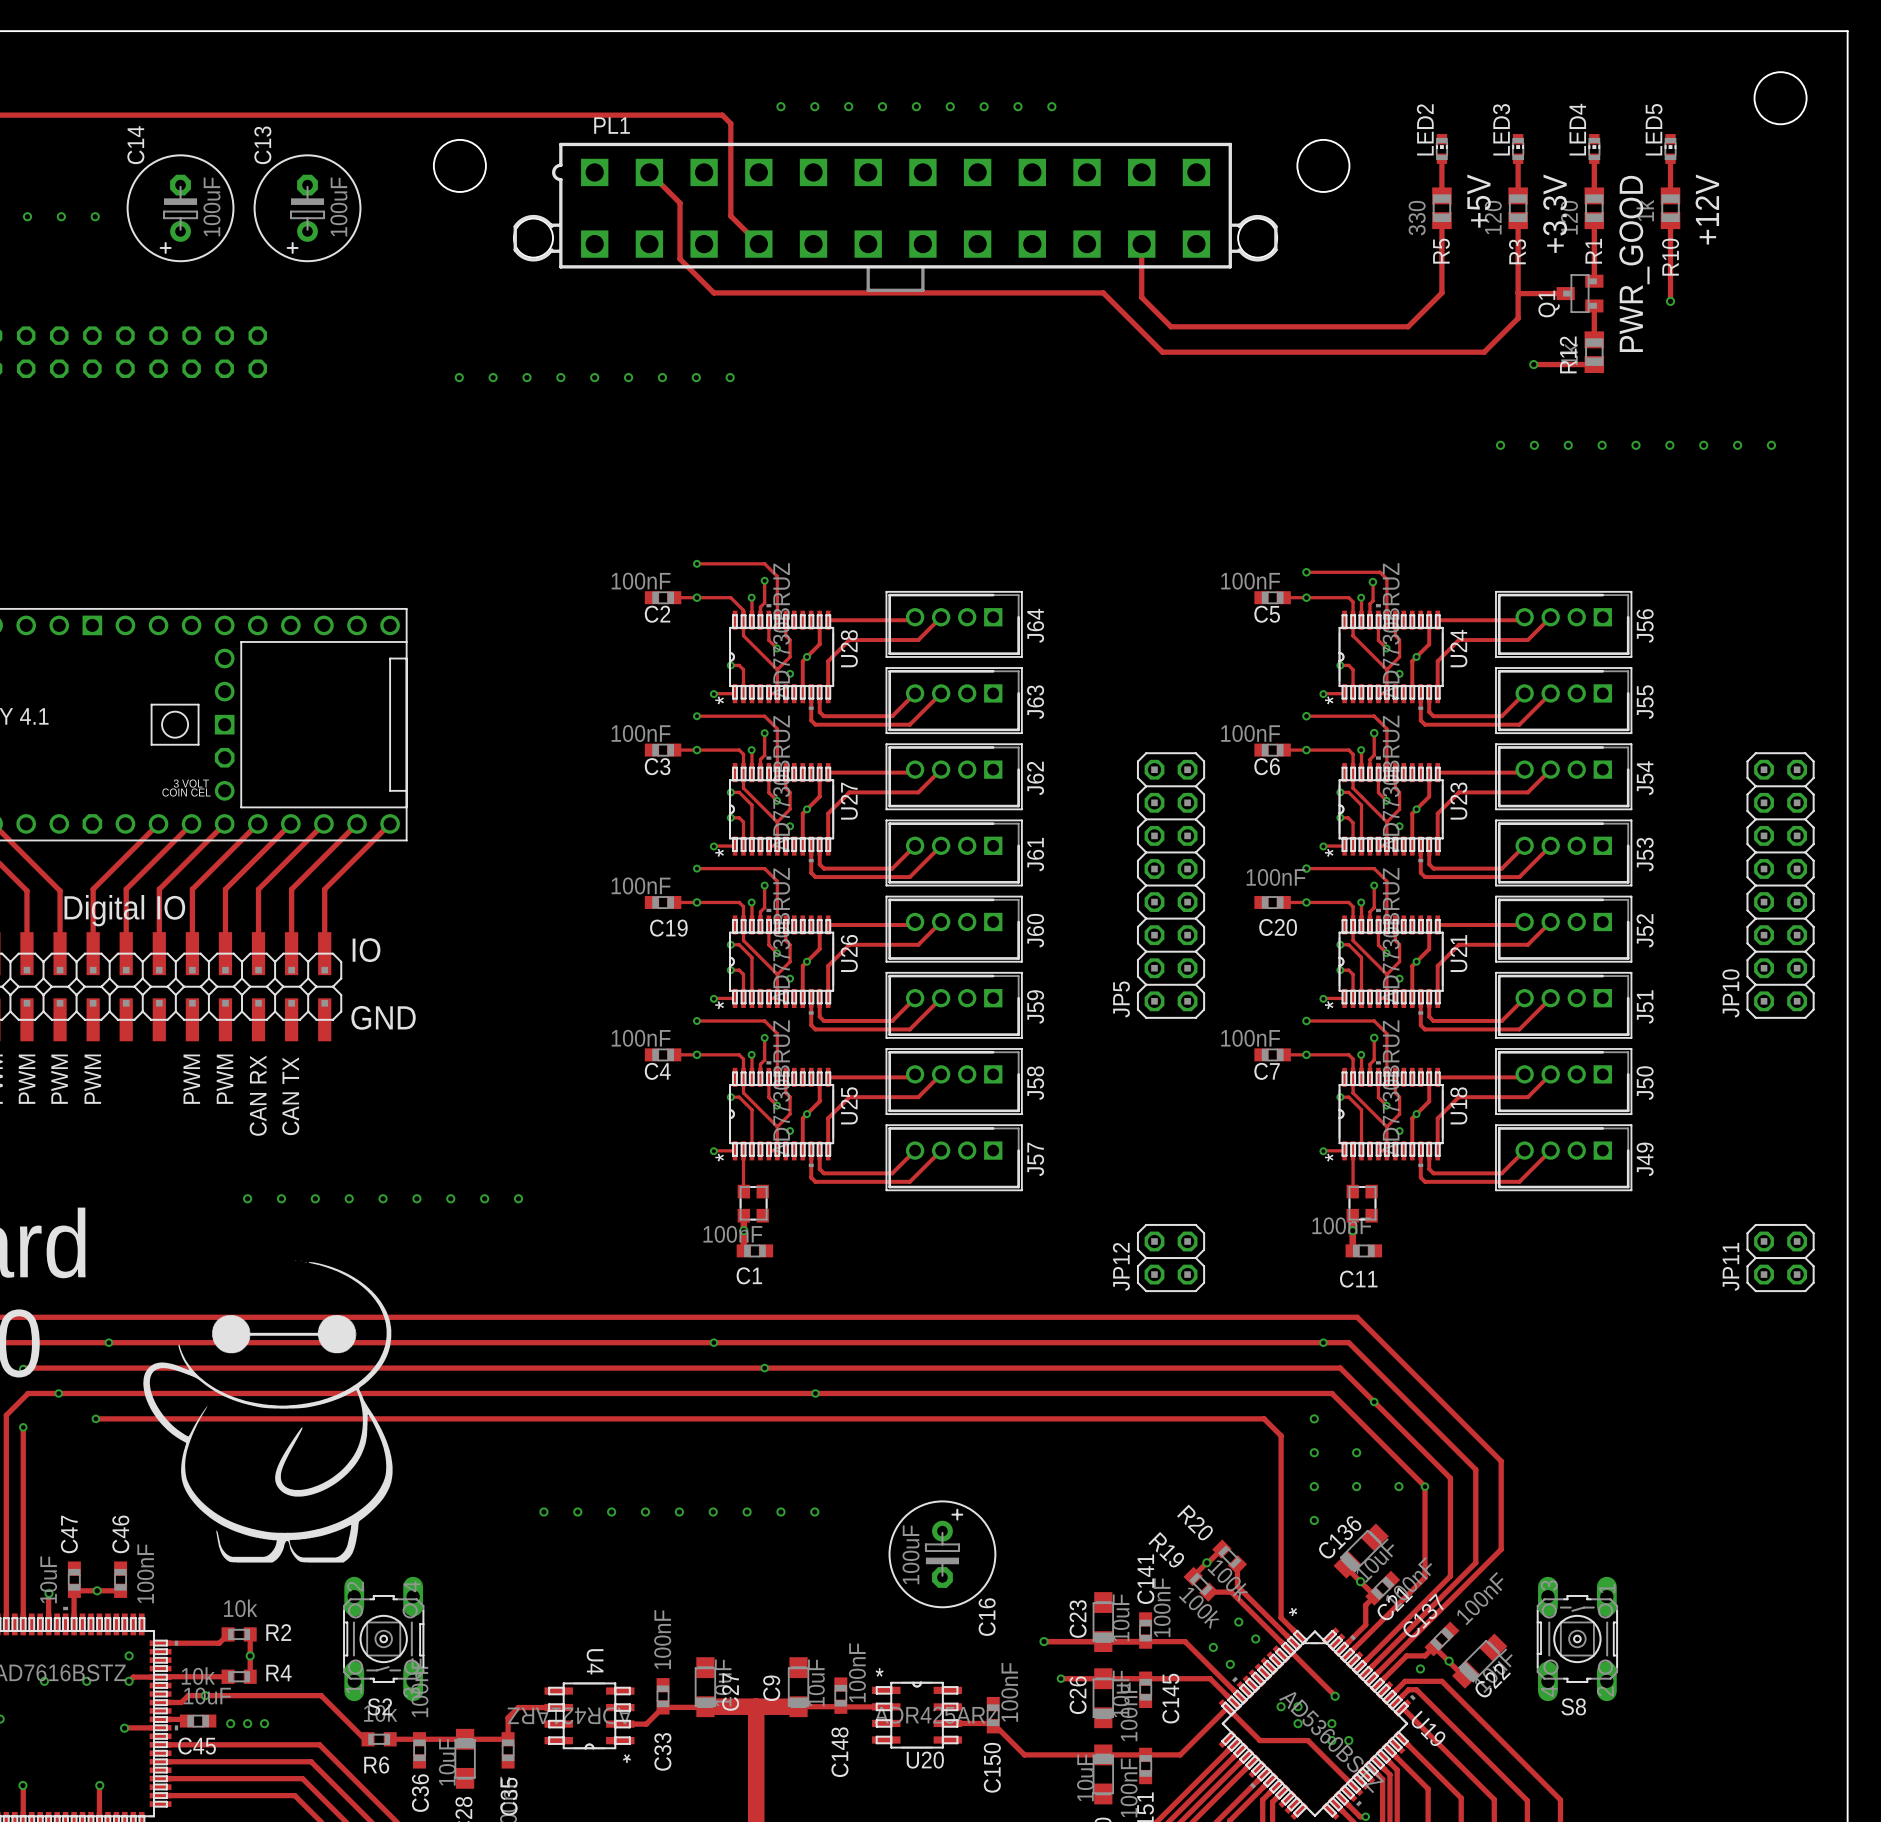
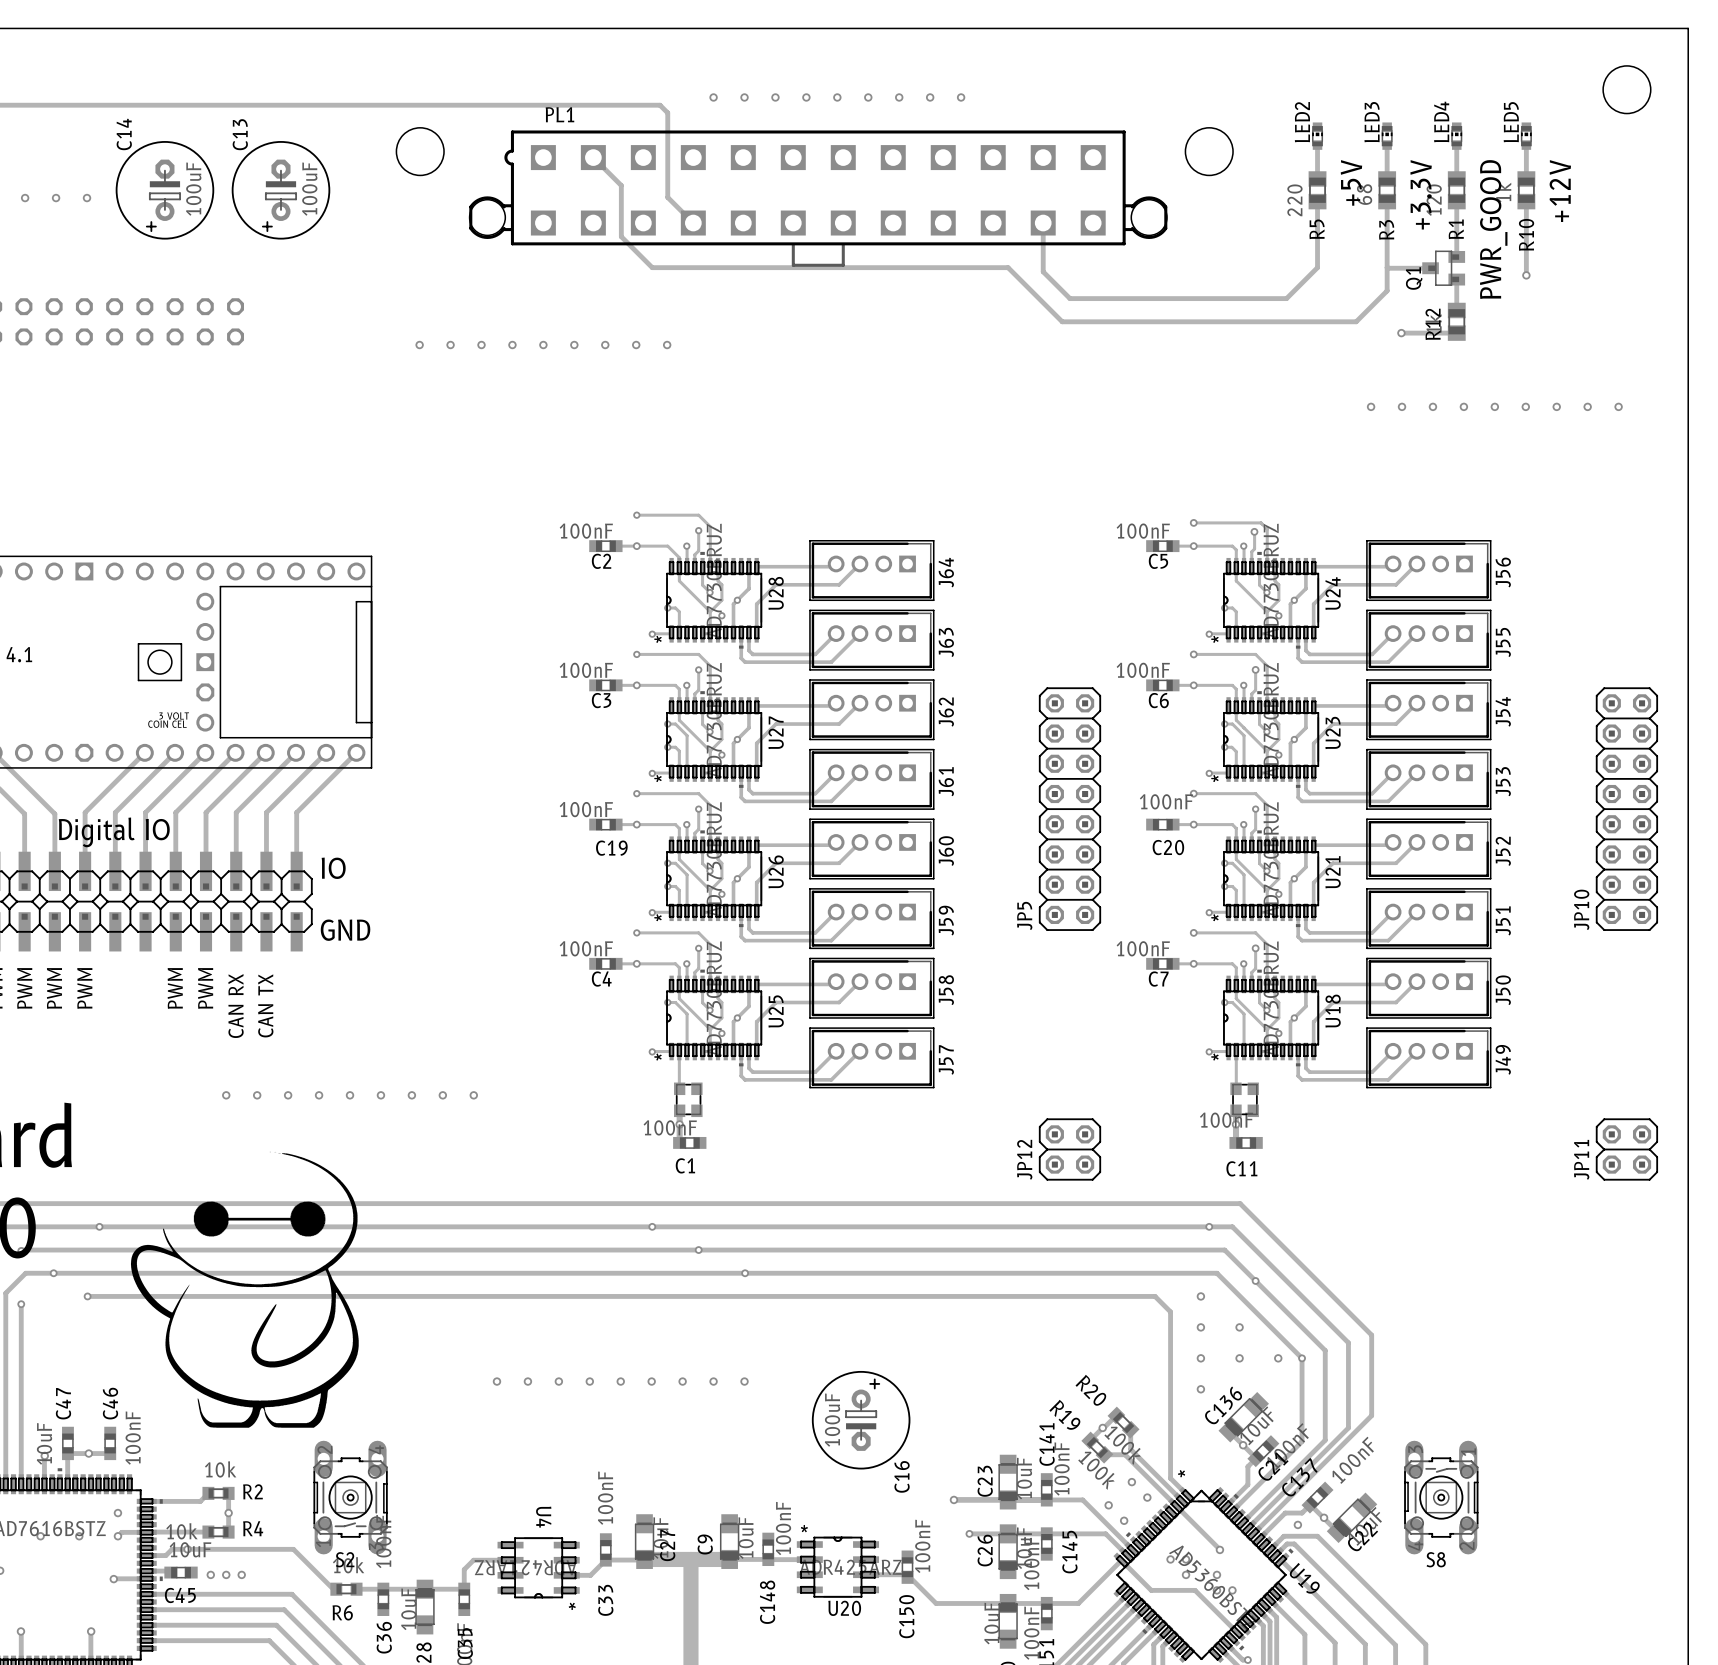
R3 value: 120 (1493, 217) -> 68 (1364, 194)
R5 value: 330 (1417, 218) -> 220 (1294, 200)

